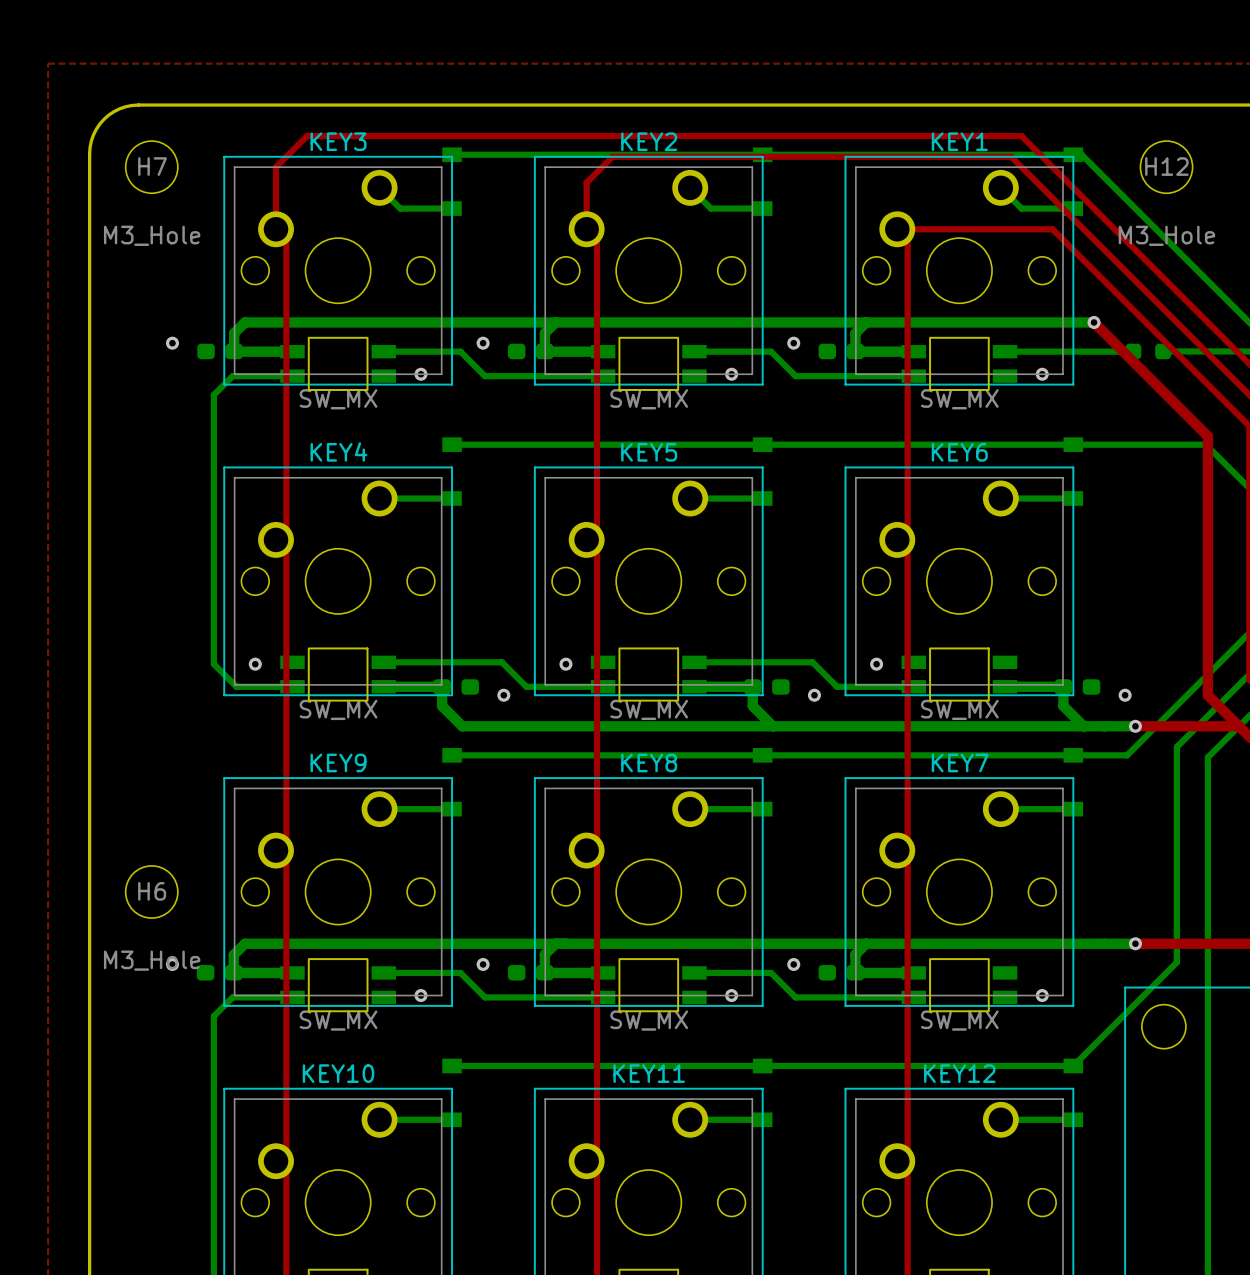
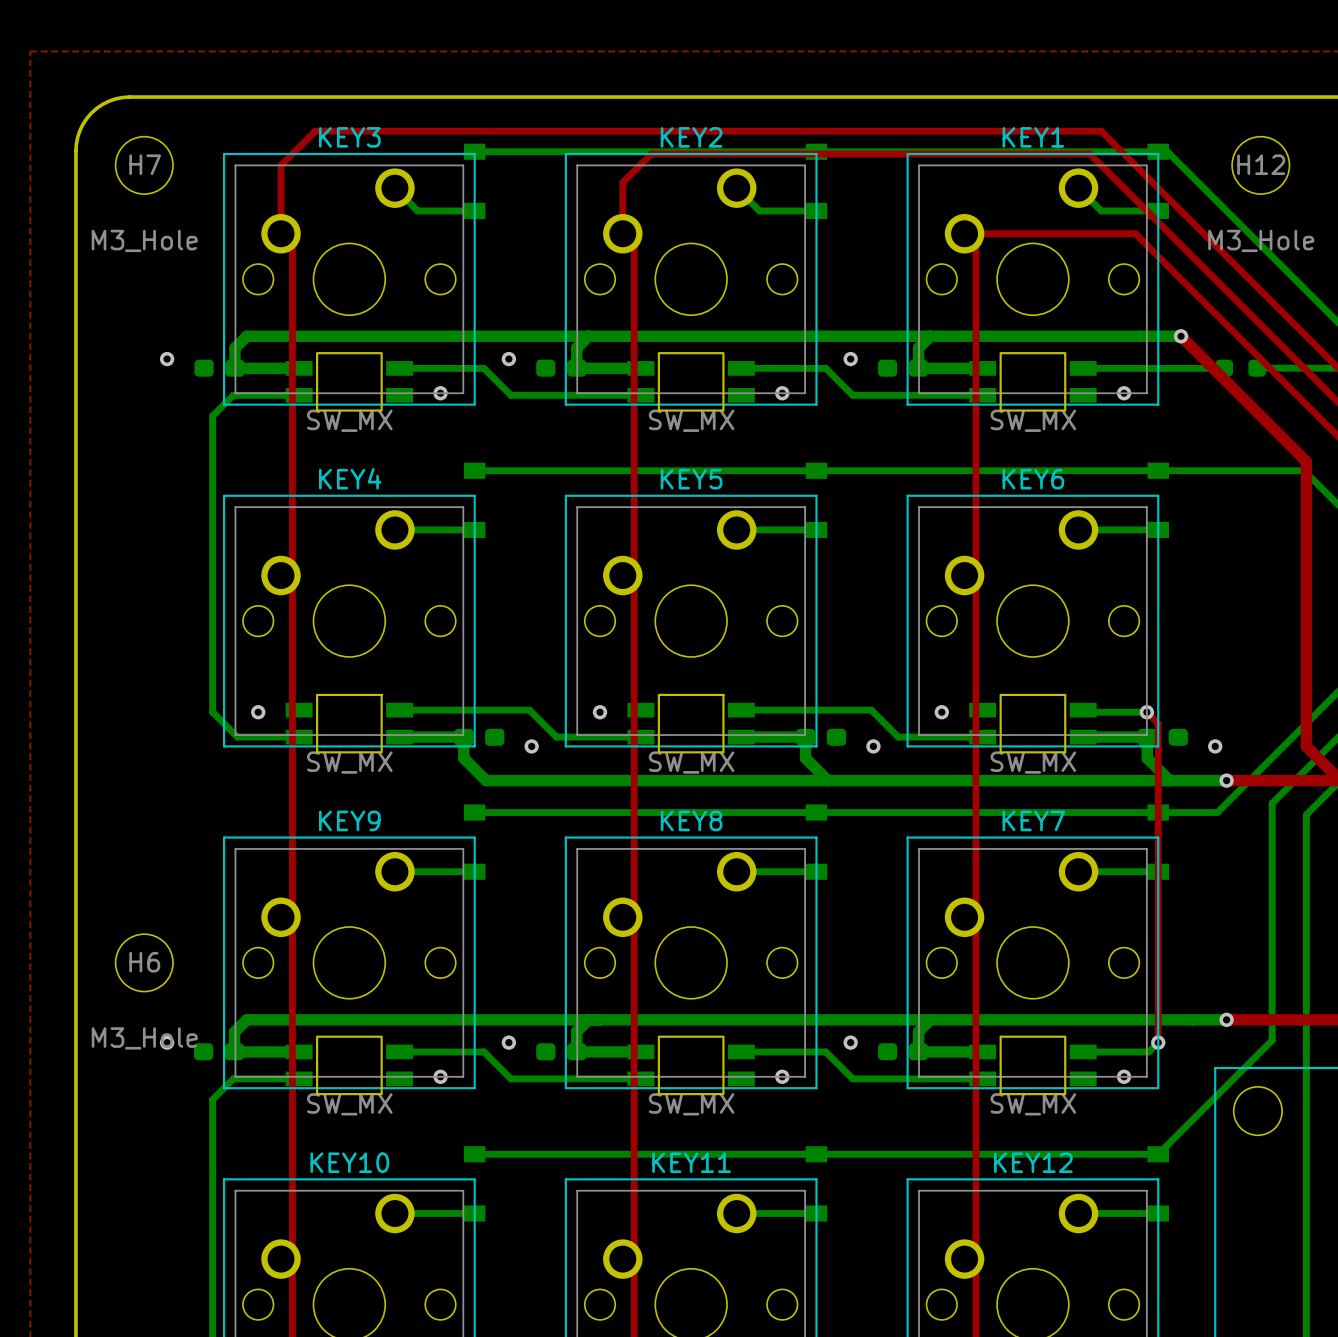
bottom track: none -> (1083, 710) (1085, 712) (1146, 712)
top track: none -> (1146, 712) (1158, 723) (1158, 1042)
via: none -> (1146, 712)
bottom track: none -> (1158, 1042) (1148, 1051) (1083, 1051)
via: none -> (1158, 1042)

